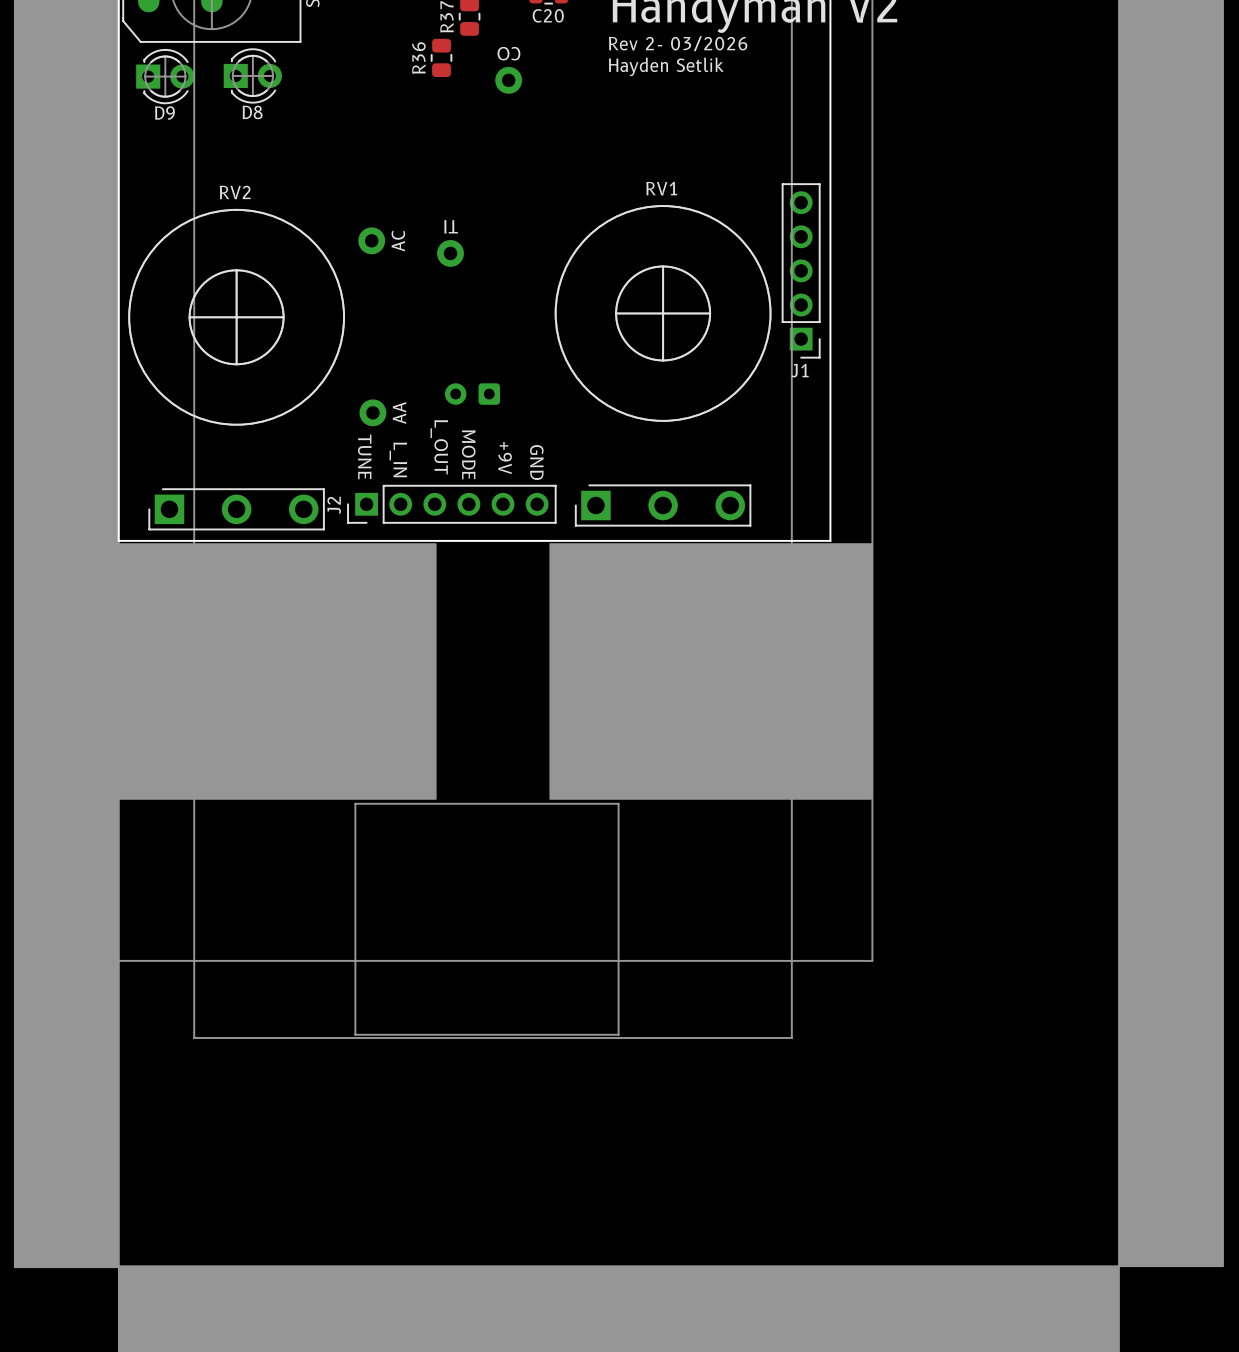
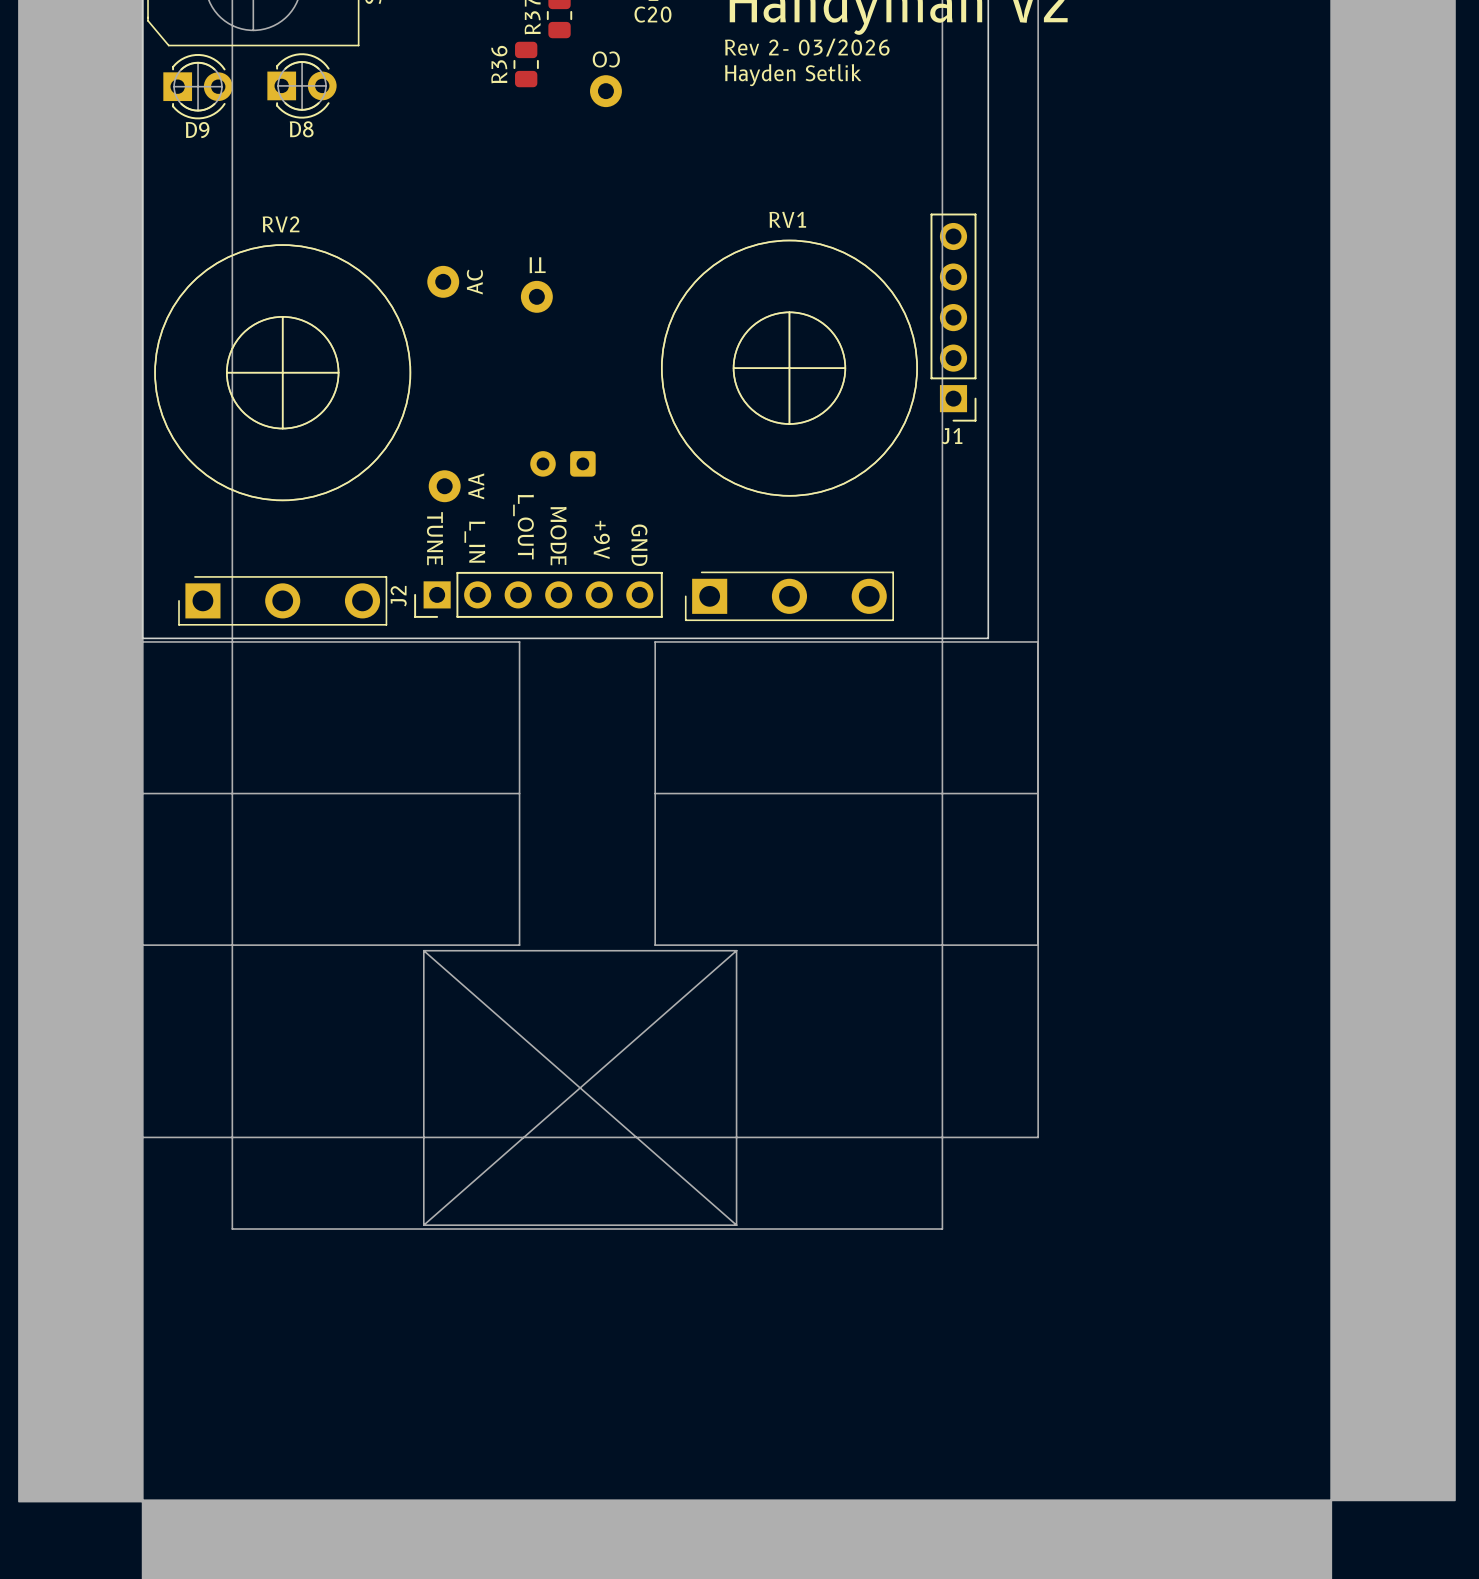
drawing: [112, 543, 437, 800] -> none
line: none -> (136, 641) (519, 641) (519, 945) (136, 945) (136, 641)
drawing: [549, 543, 874, 800] -> none
line: none -> (1038, 641) (655, 641) (655, 945) (1038, 945)
line: none -> (136, 793) (519, 793)
line: none -> (655, 793) (1038, 793)
line: none -> (423, 950) (736, 1225)
line: none -> (736, 950) (423, 1225)

